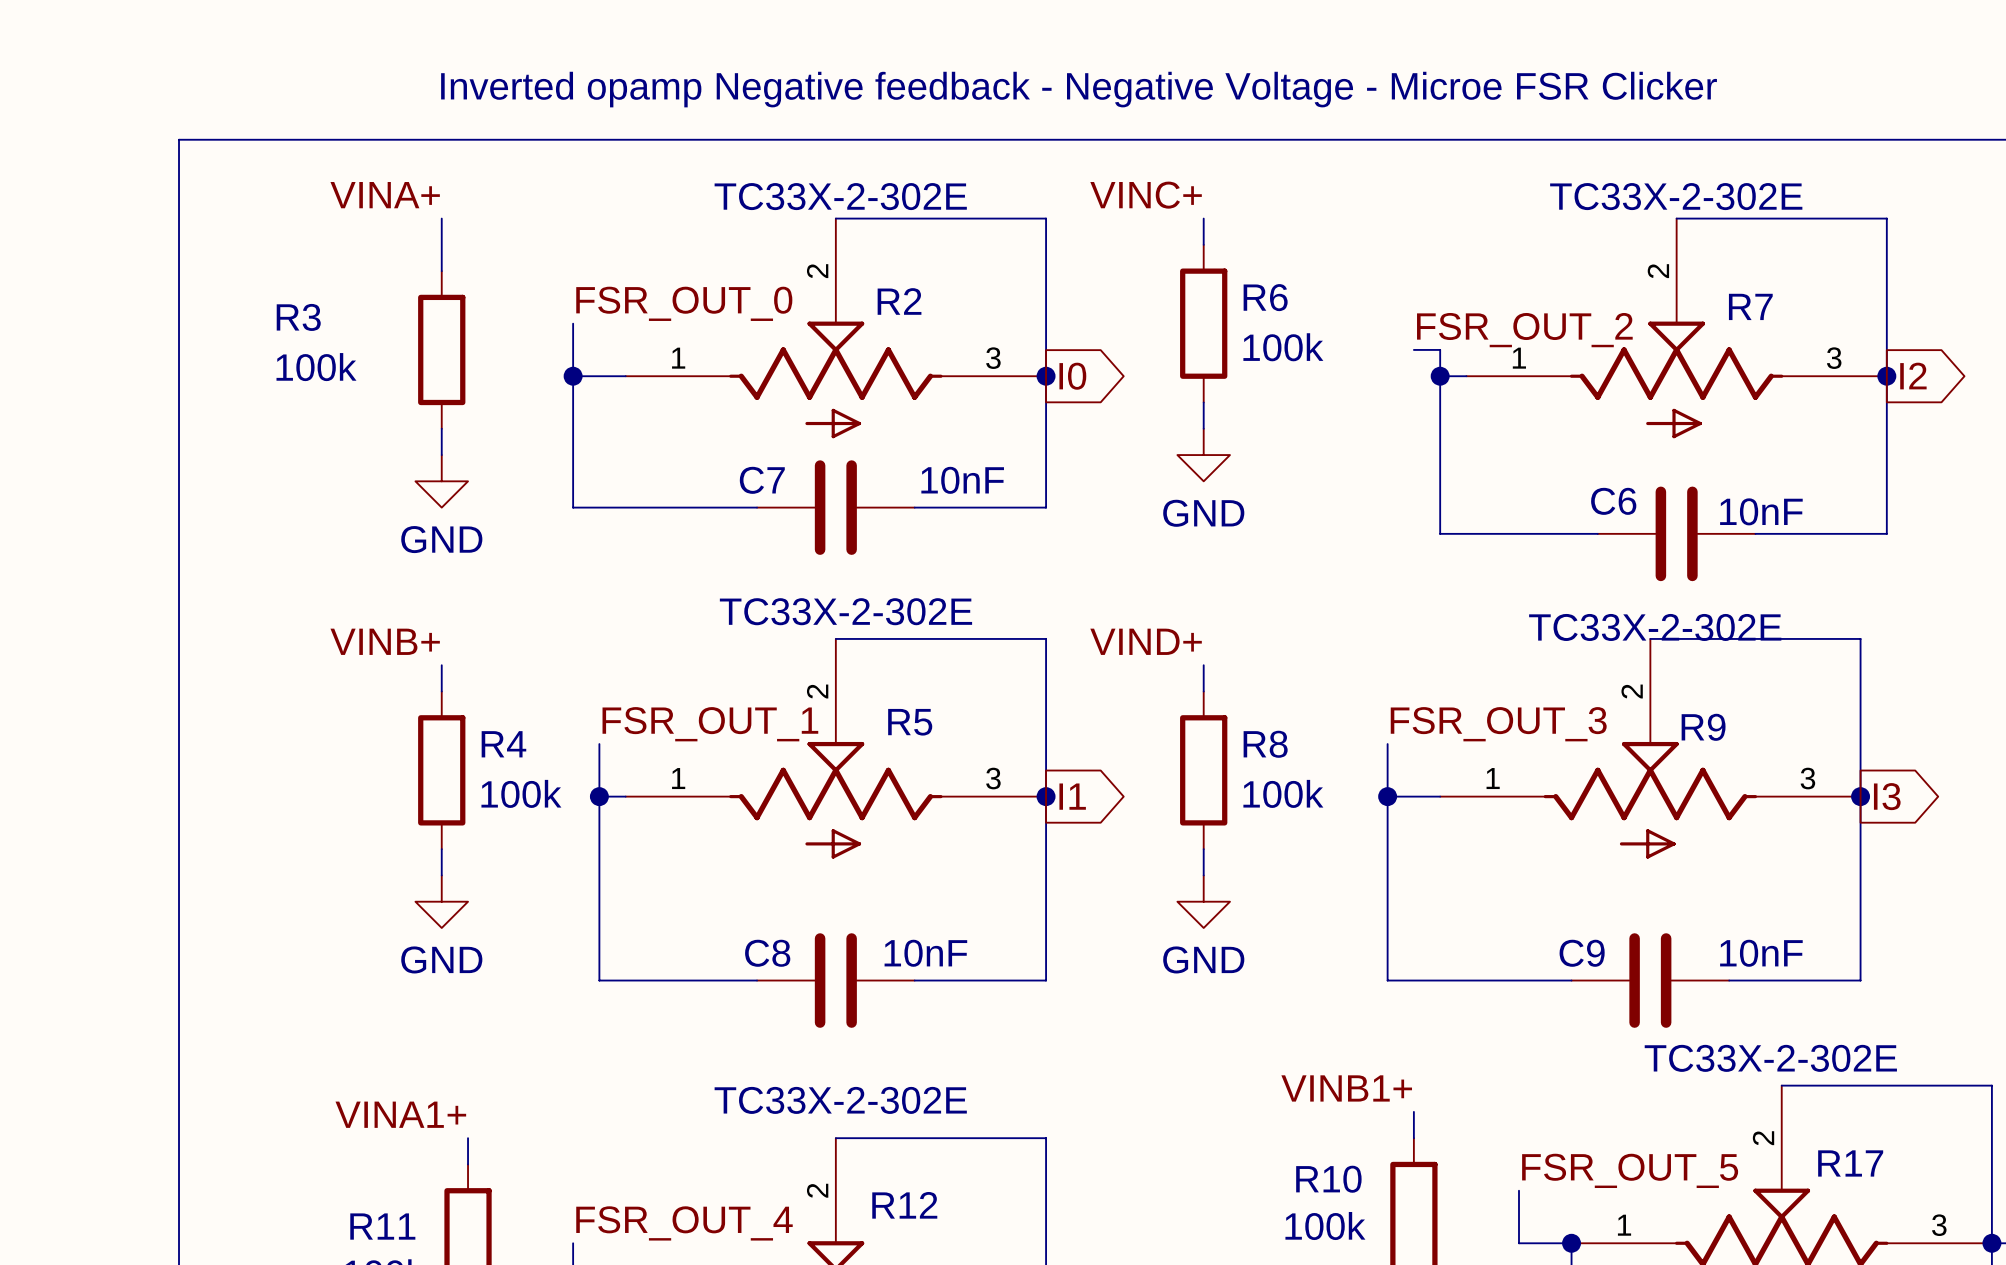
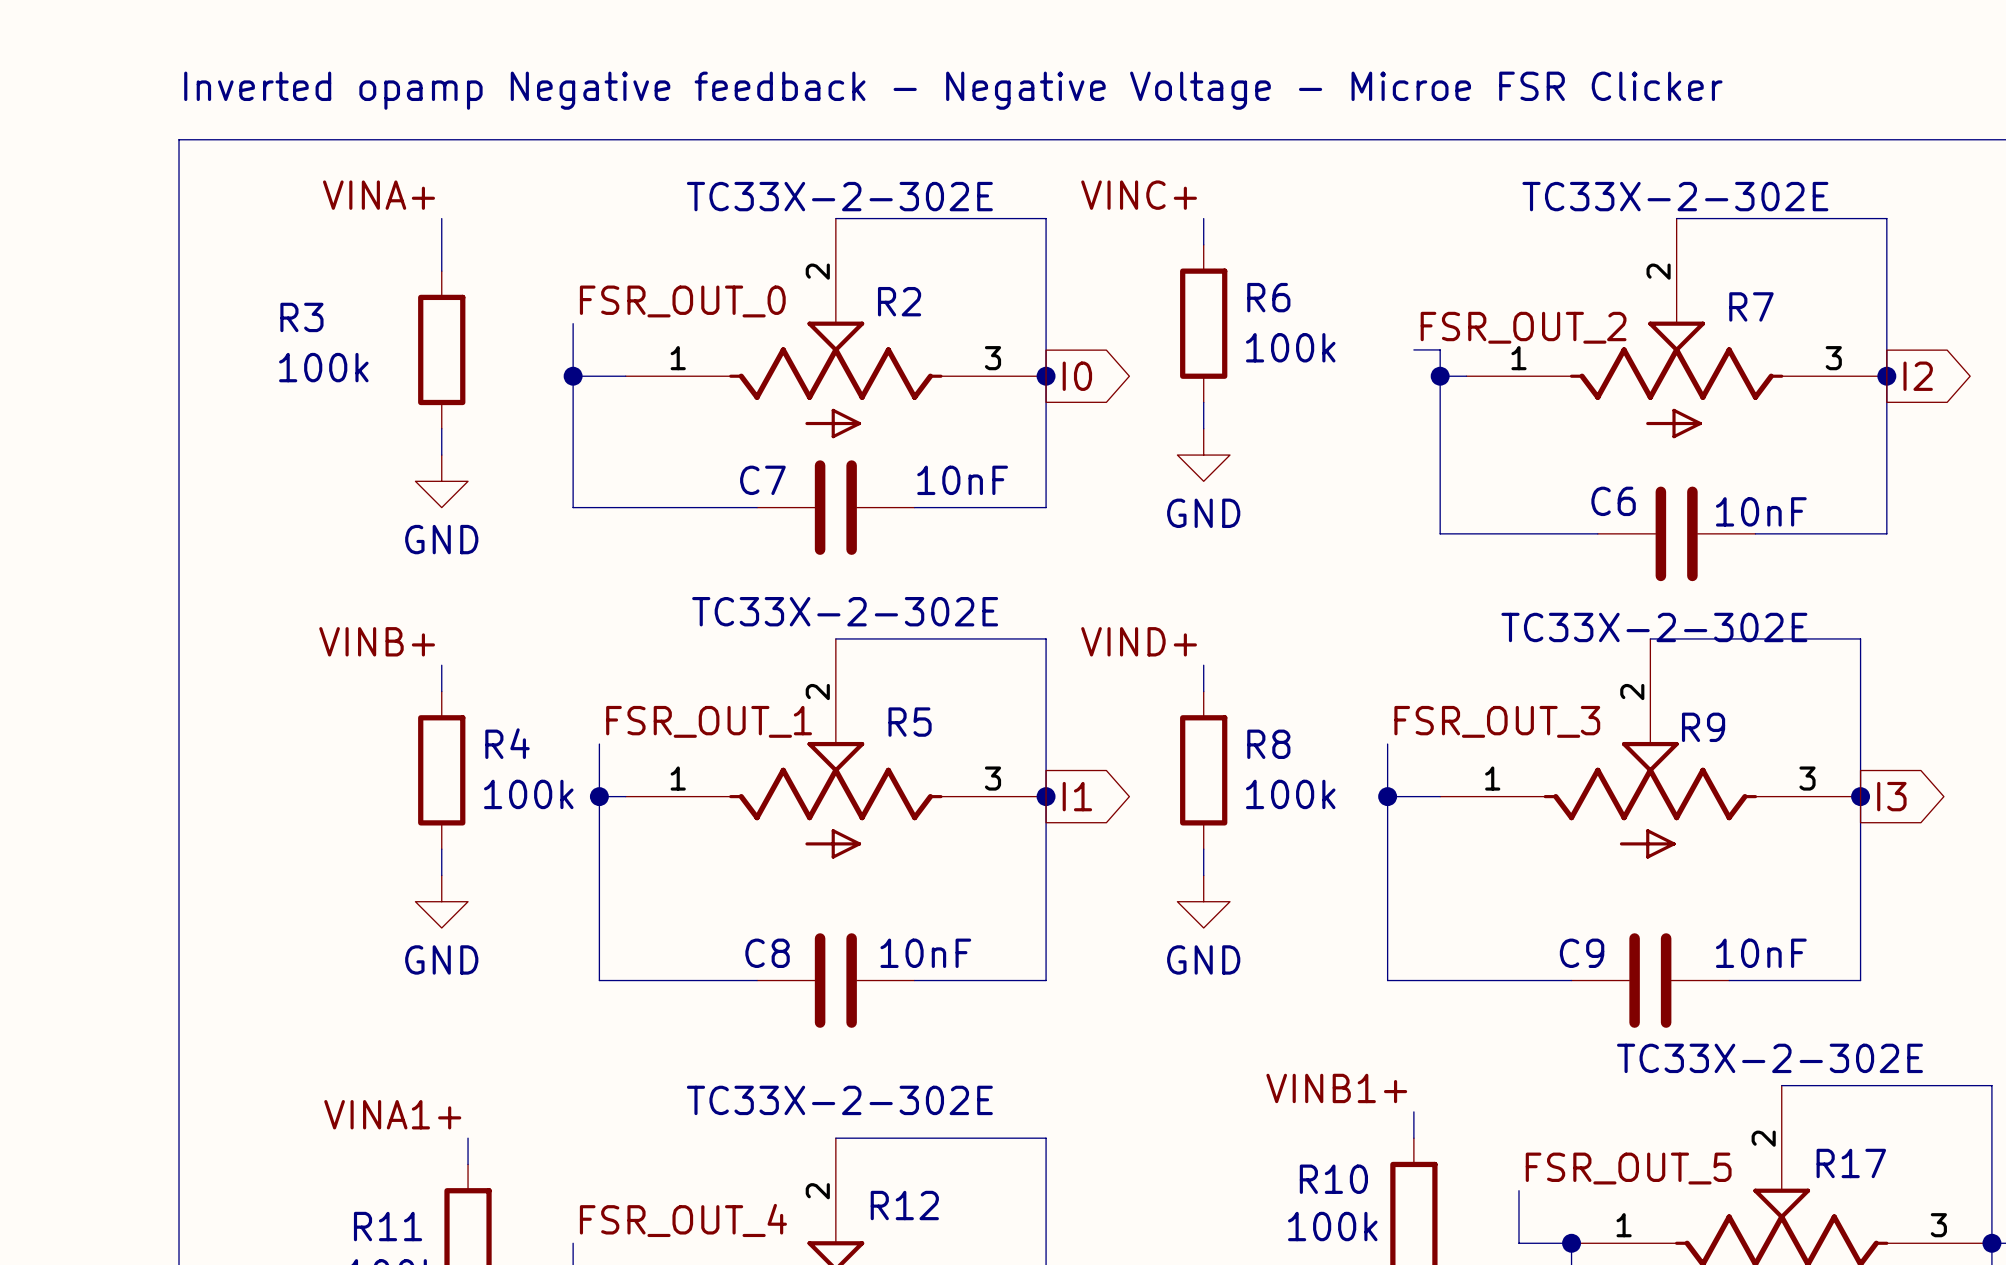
text position: Inverted opamp Negative feedback - Negative Voltage - Microe FSR Clicker (1079, 89) -> Inverted opamp Negative feedback - Negative Voltage - Microe FSR Clicker (953, 90)

